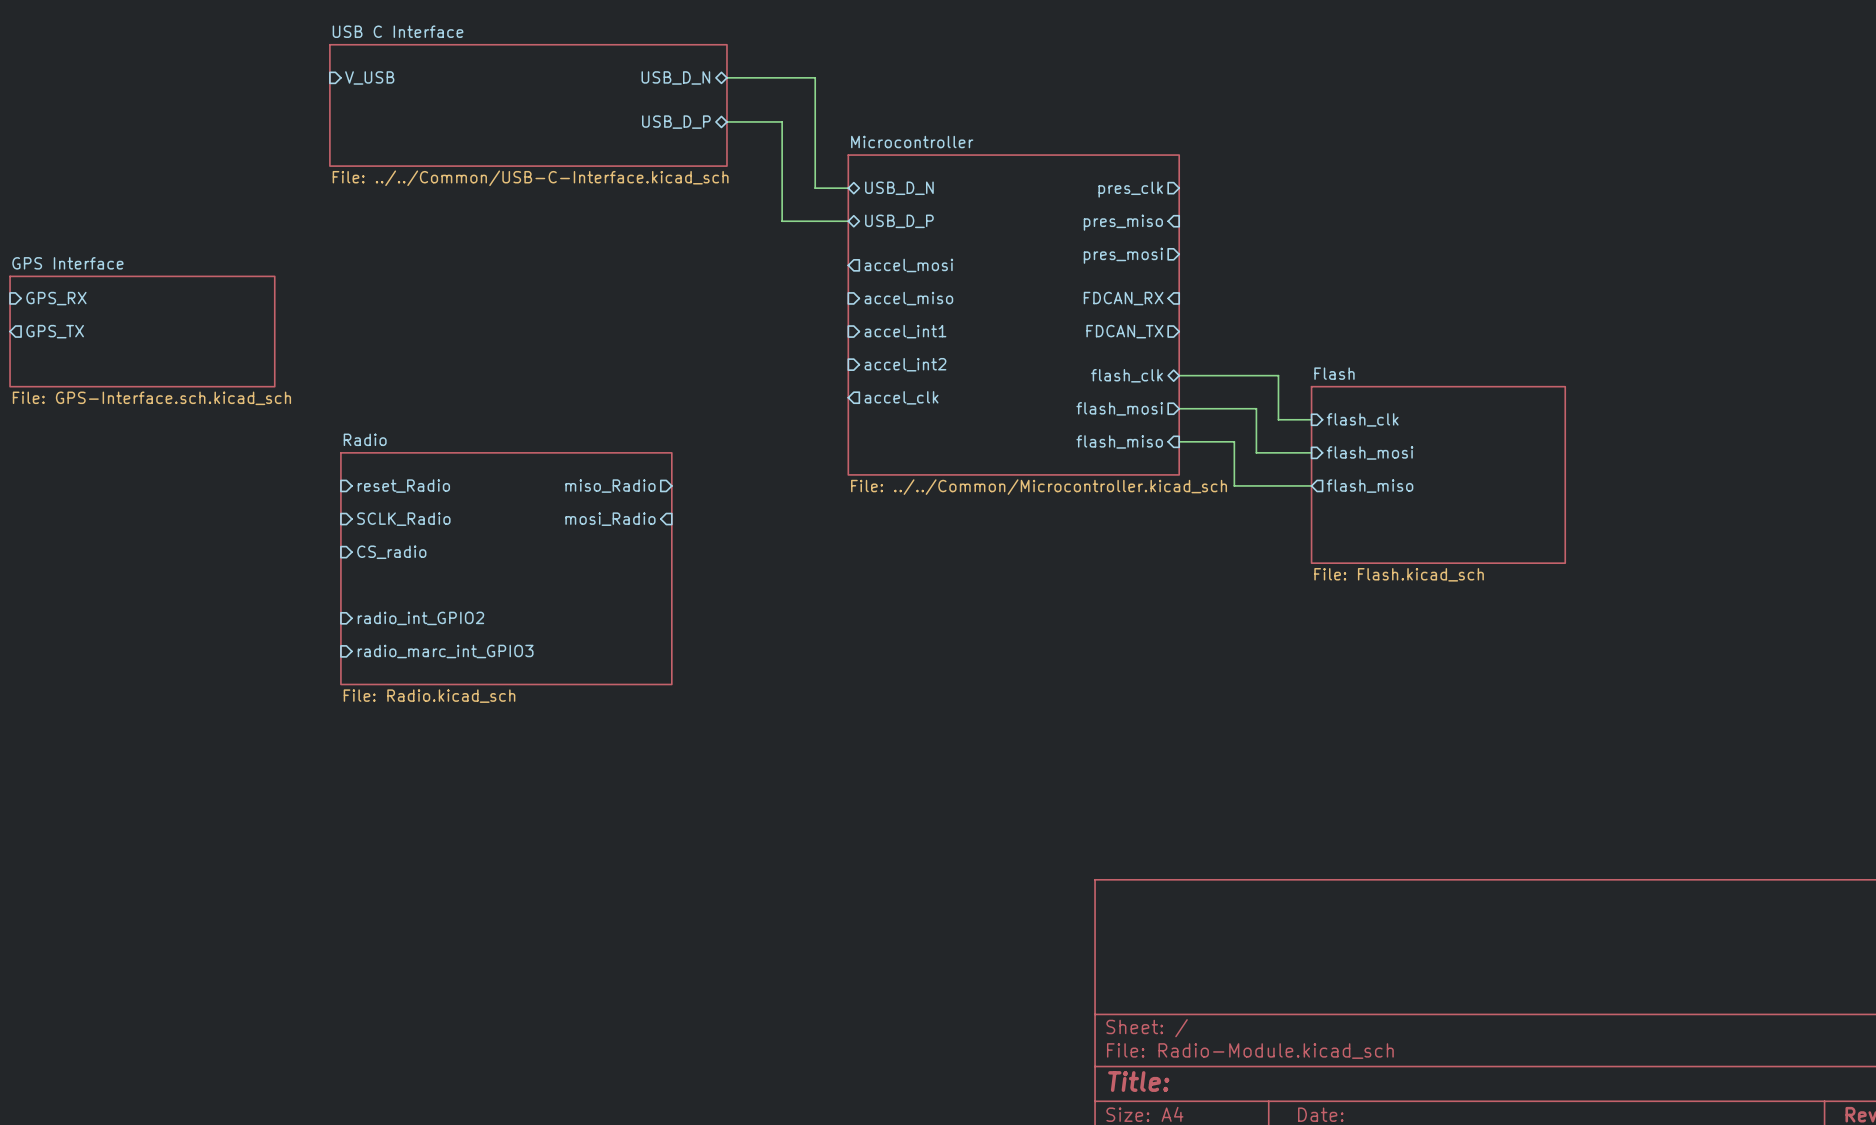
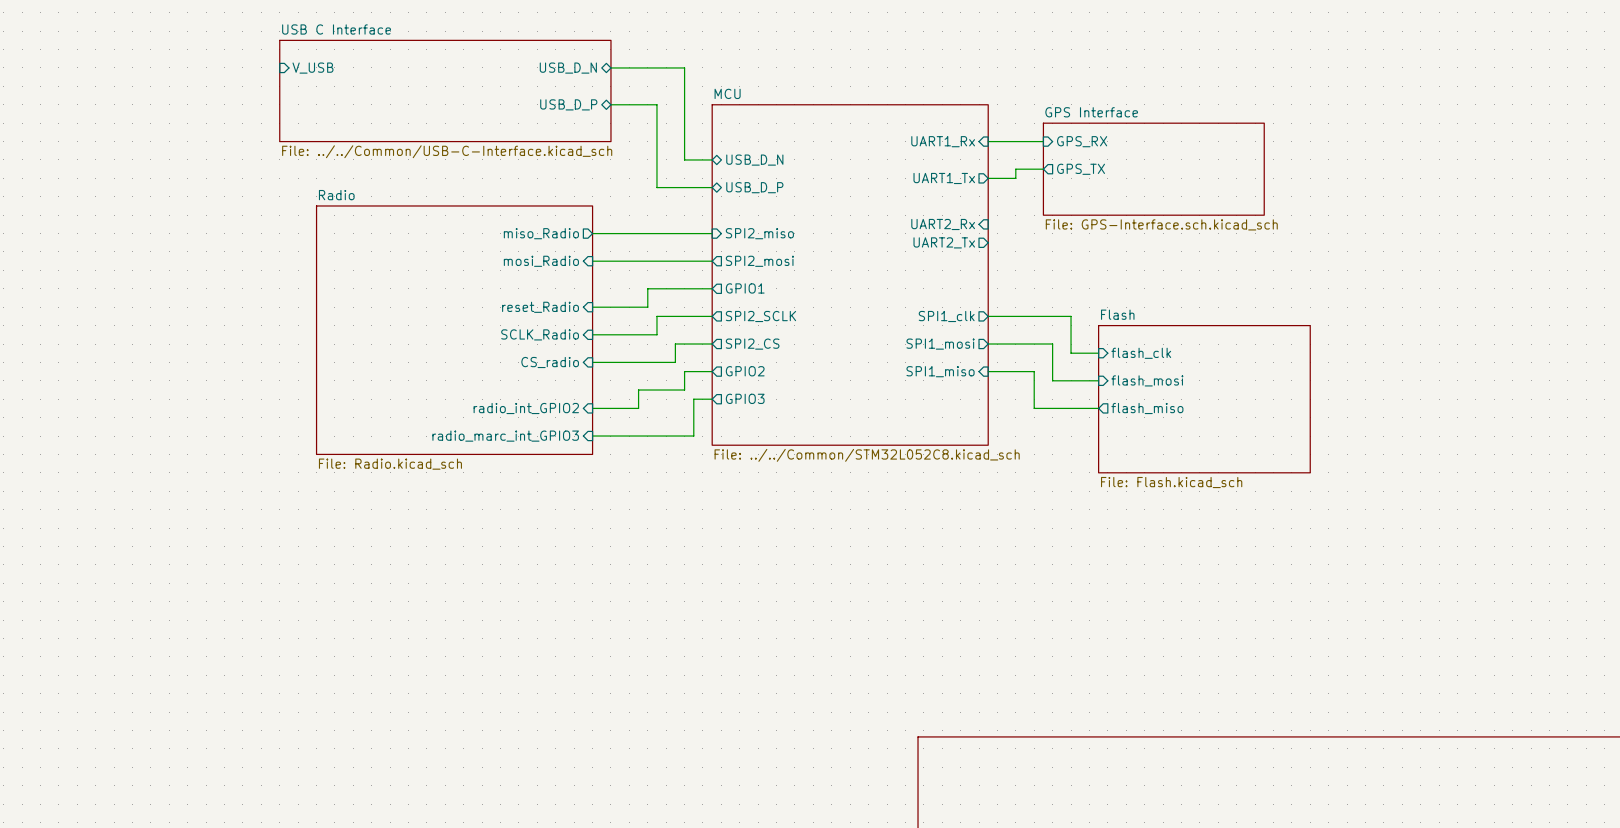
sheet pin: none -> UART1_Rx (943, 141)
wire: none -> (988, 141) (1043, 141)
sheet pin: none -> GPS_RX (1082, 141)
sheet pin: pres_clk (1130, 189) -> none
wire: none -> (1043, 169) (1015, 169) (1015, 178) (988, 178)
sheet pin: none -> GPS_TX (1081, 169)
sheet GPS Interface: none -> File: GPS-Interface.sch.kicad_sch (1153, 169)
sheet pin: none -> UART1_Tx (944, 178)
sheet pin: pres_miso (1123, 222) -> none
sheet pin: pres_mosi (1123, 255) -> none
sheet pin: accel_mosi (908, 265) -> none
sheet pin: none -> UART2_Rx (943, 224)
wire: none -> (592, 233) (712, 233)
sheet pin: none -> SPI2_miso (759, 233)
sheet pin: none -> UART2_Tx (944, 242)
sheet pin: GPS_RX (56, 298) -> none
sheet pin: accel_miso (908, 298) -> none
sheet pin: FDCAN_RX (1123, 298) -> none
wire: none -> (592, 261) (712, 261)
sheet pin: none -> SPI2_mosi (759, 261)
sheet Microcontroller: File: ../../Common/Microcontroller.kicad_sch (1013, 314) -> none
sheet MCU: none -> File: ../../Common/STM32L052C8.kicad_sch (850, 274)
sheet pin: GPS_TX (55, 331) -> none
sheet GPS Interface: File: GPS-Interface.sch.kicad_sch (142, 331) -> none
sheet pin: accel_int1 (905, 331) -> none
sheet pin: FDCAN_TX (1124, 331) -> none
wire: none -> (712, 288) (647, 288) (647, 307) (592, 307)
sheet pin: none -> GPIO1 (745, 288)
sheet pin: none -> reset_Radio (540, 307)
sheet pin: accel_int2 (905, 364) -> none
wire: none -> (712, 316) (656, 316) (656, 334) (592, 334)
sheet pin: none -> SPI2_SCLK (760, 316)
sheet pin shape: bidirectional (1127, 375) -> output (946, 316)
sheet pin: flash_clk (1127, 375) -> SPI1_clk (946, 316)
sheet Radio: none -> File: Radio.kicad_sch (454, 330)
sheet pin: none -> SCLK_Radio (540, 334)
sheet pin: accel_clk (901, 397) -> none
wire: none -> (712, 344) (675, 344) (675, 362) (592, 362)
sheet pin: none -> SPI2_CS (752, 344)
sheet pin: flash_mosi (1119, 408) -> SPI1_mosi (940, 344)
sheet pin: none -> CS_radio (550, 362)
wire: none -> (712, 371) (684, 371) (684, 390) (638, 390) (638, 408) (592, 408)
sheet pin: none -> GPIO2 (745, 371)
sheet pin: flash_miso (1119, 441) -> SPI1_miso (940, 371)
wire: none -> (712, 399) (693, 399) (693, 436) (592, 436)
sheet pin: none -> GPIO3 (745, 398)
sheet pin: reset_Radio (403, 486) -> none
sheet pin position: miso_Radio (610, 486) -> miso_Radio (541, 233)
sheet pin: none -> radio_int_GPIO2 (526, 408)
sheet pin: SCLK_Radio (403, 519) -> none
sheet pin: none -> radio_marc_int_GPIO3 (505, 436)
sheet pin position: mosi_Radio (610, 519) -> mosi_Radio (541, 261)
sheet pin: CS_radio (391, 552) -> none
sheet Radio: File: Radio.kicad_sch (506, 568) -> none
sheet pin: radio_int_GPIO2 (420, 618) -> none
sheet pin: radio_marc_int_GPIO3 (445, 651) -> none

